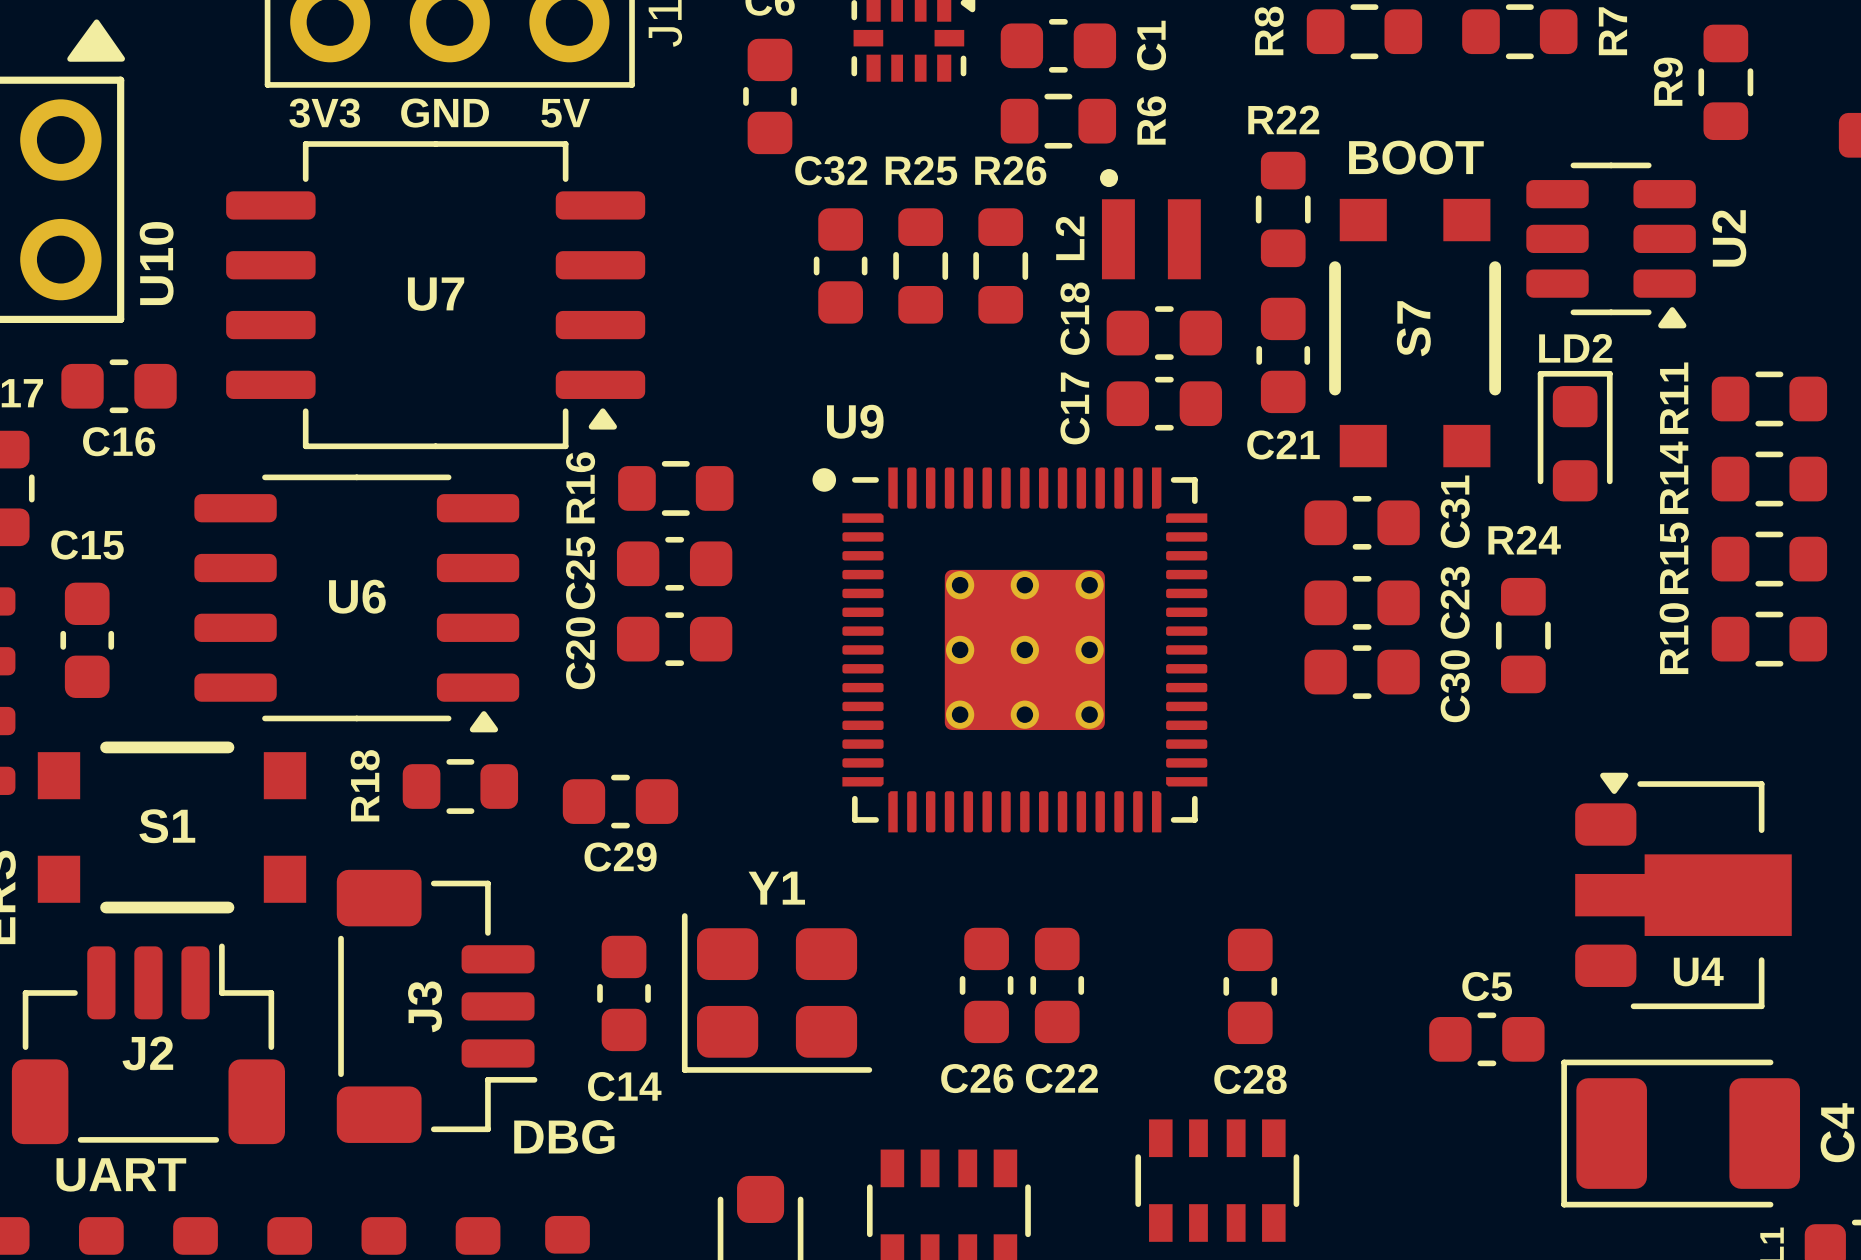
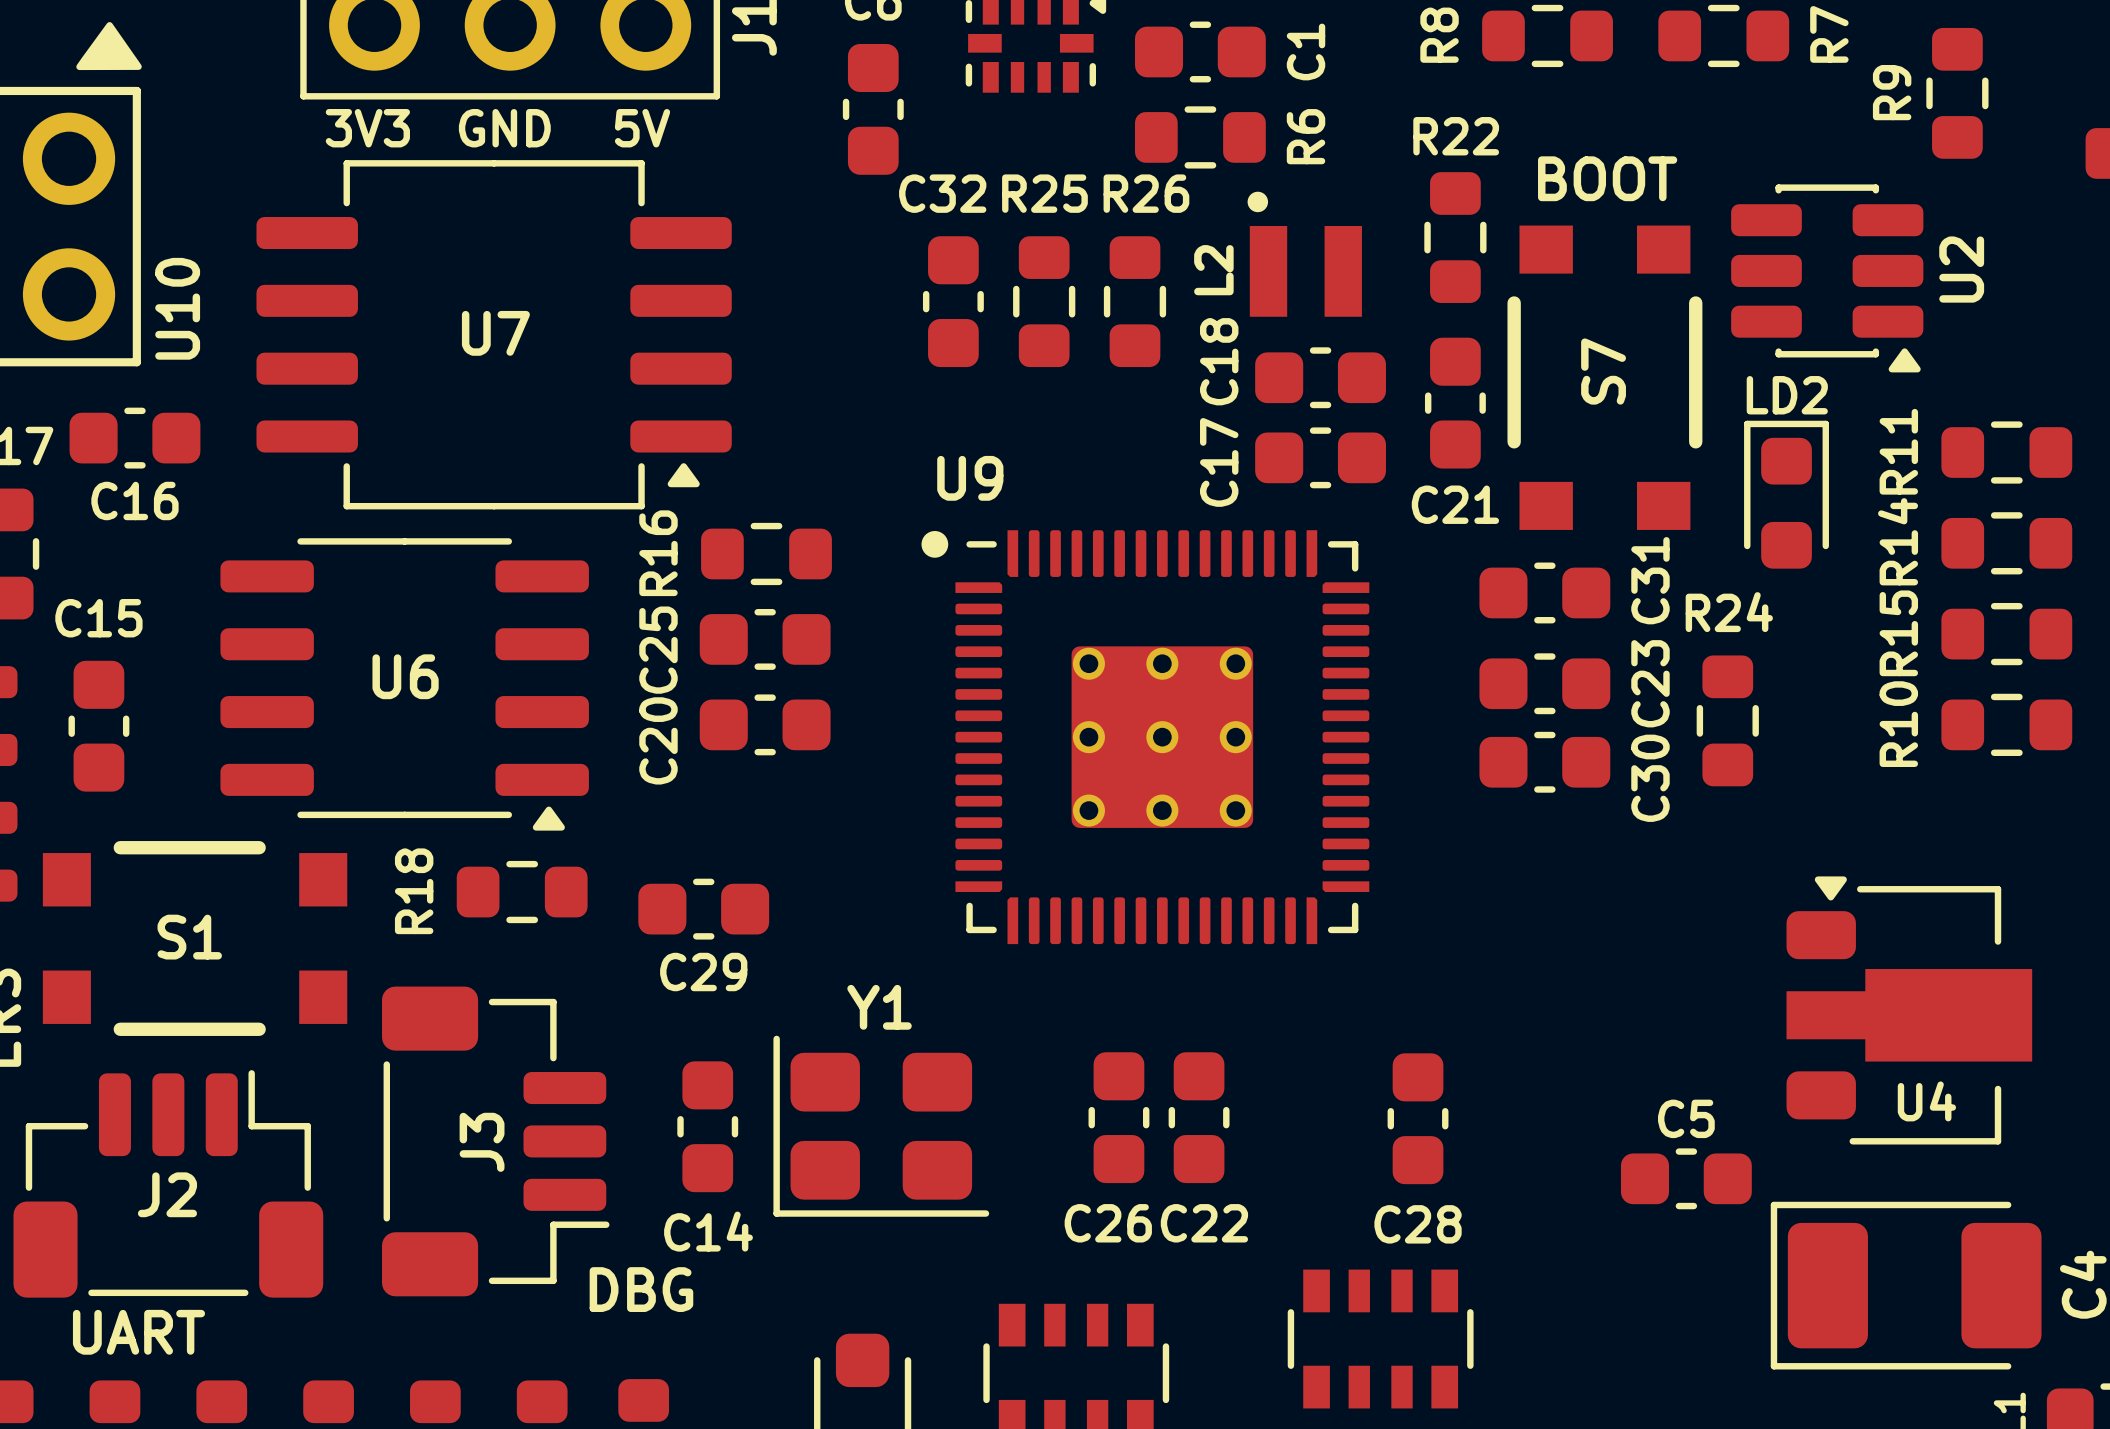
U2 footprint: [1526, 162, 1696, 329] -> [1731, 184, 1924, 373]

